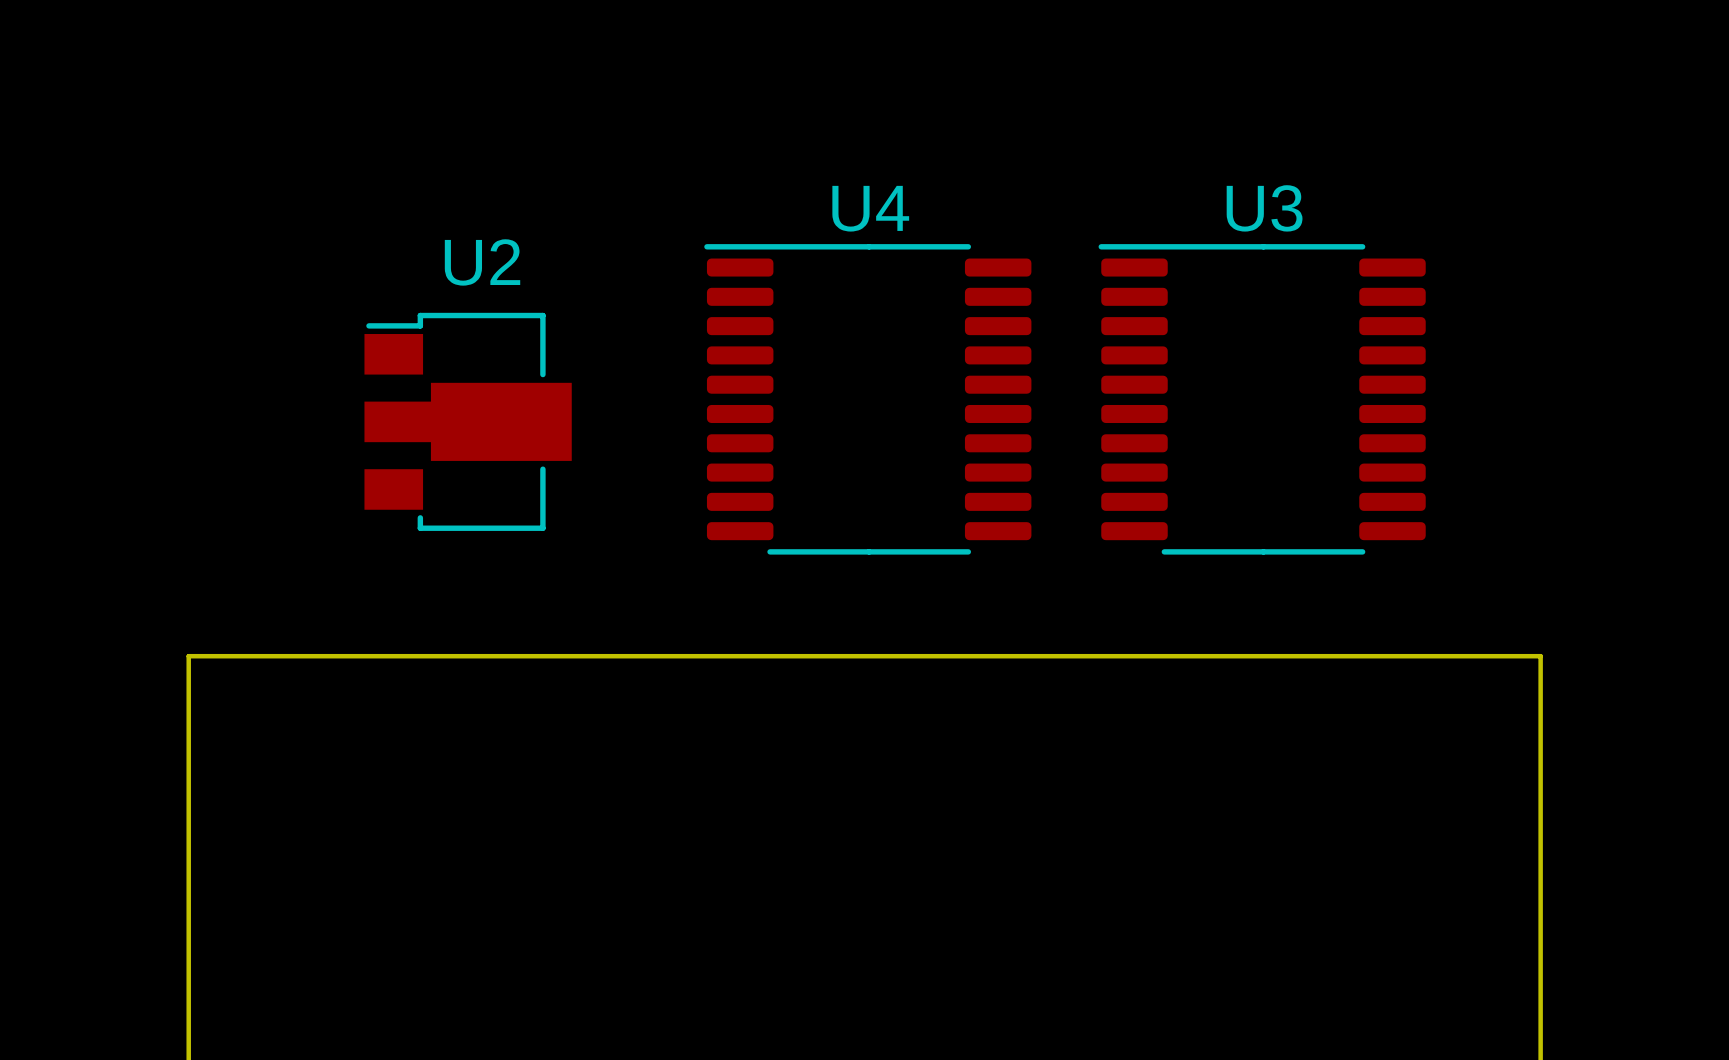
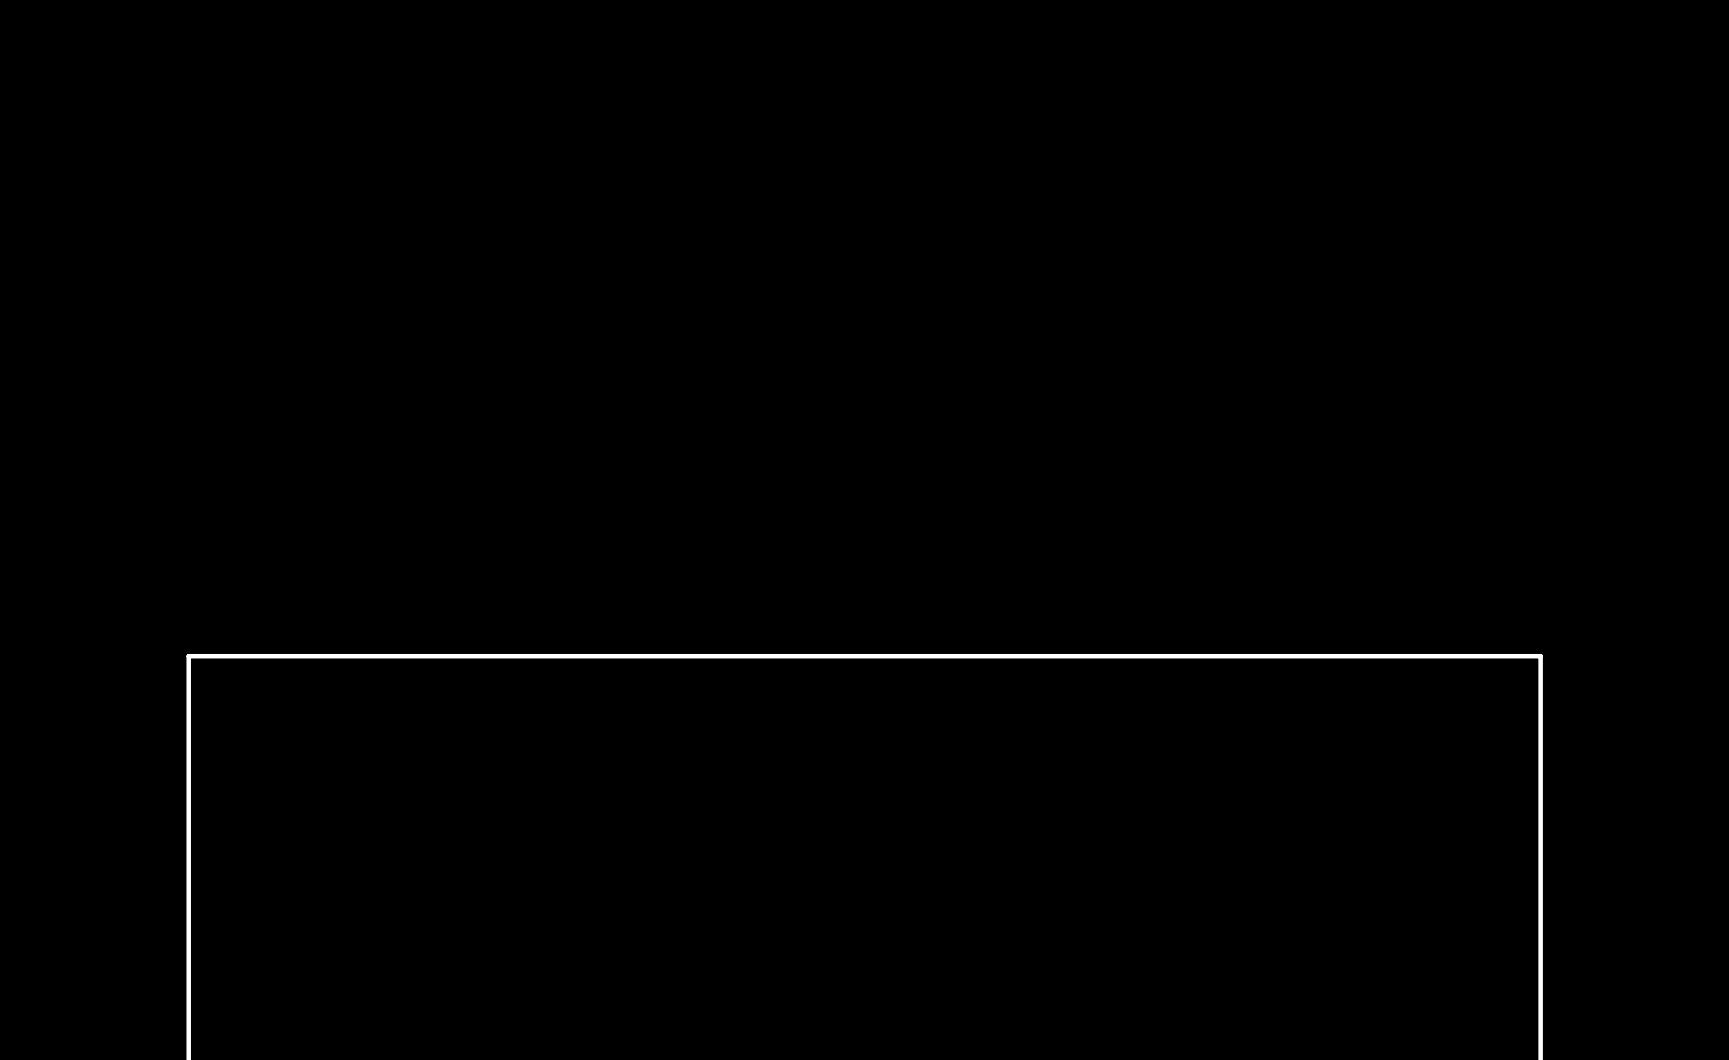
U4: (867, 399) -> none
U3: (1262, 399) -> none
U2: (468, 421) -> none

